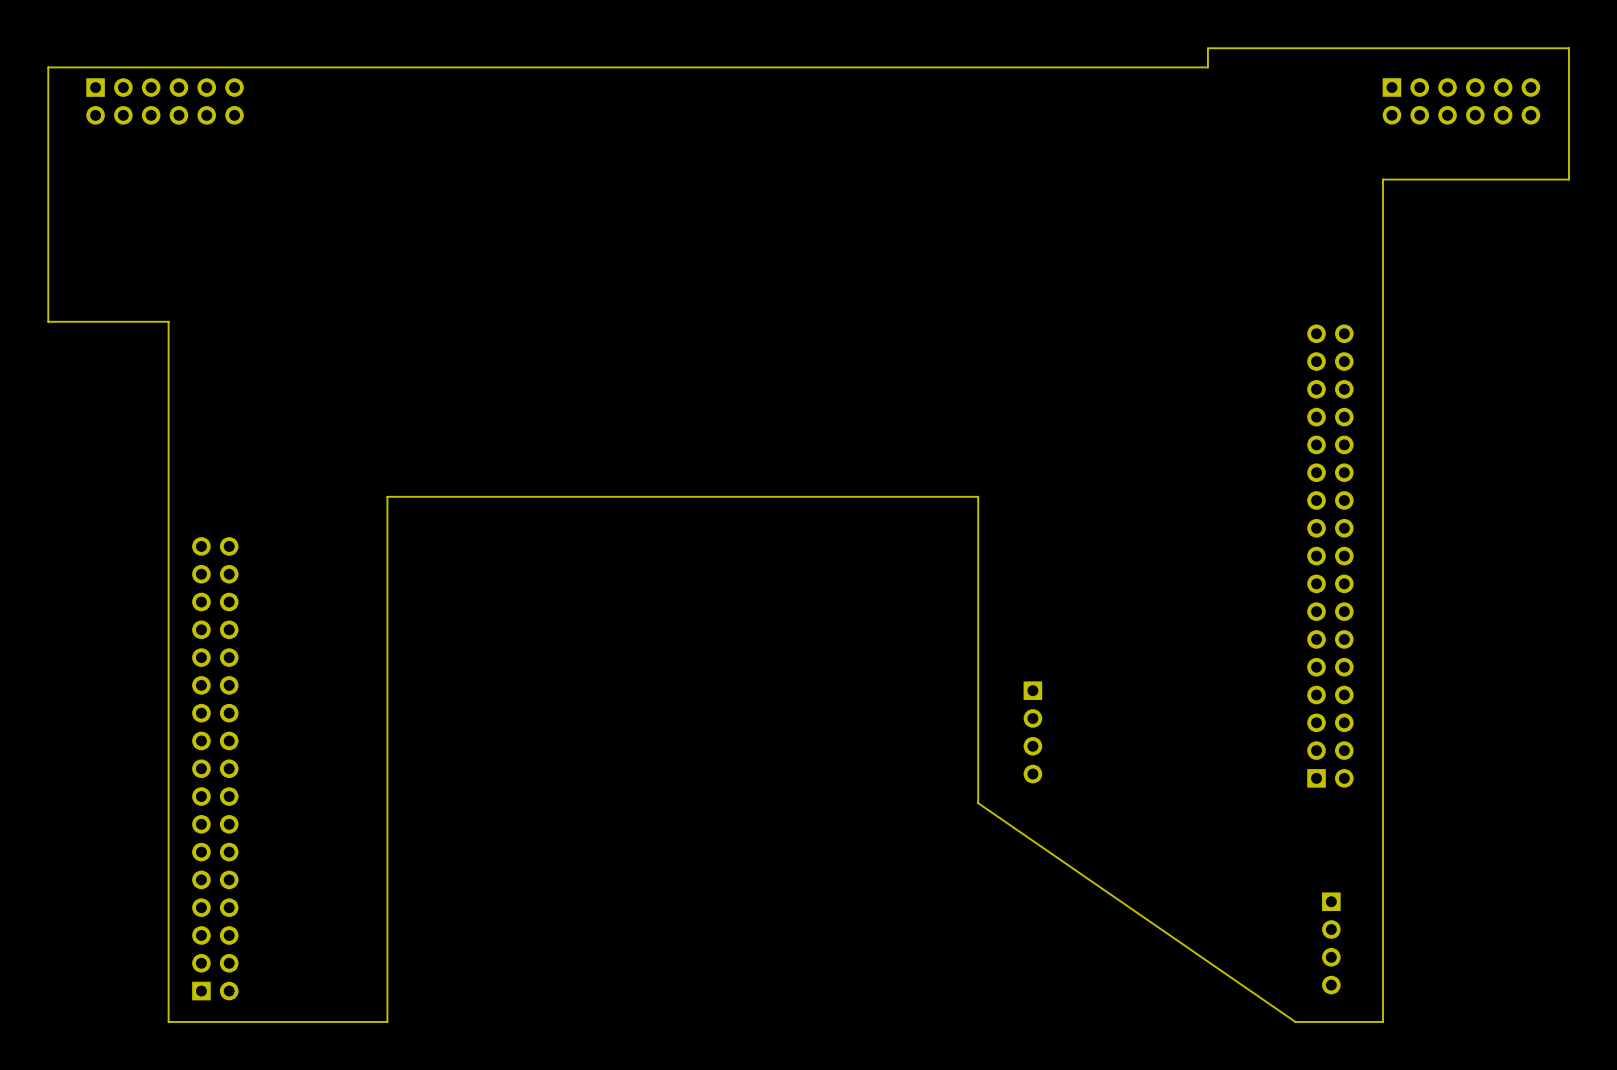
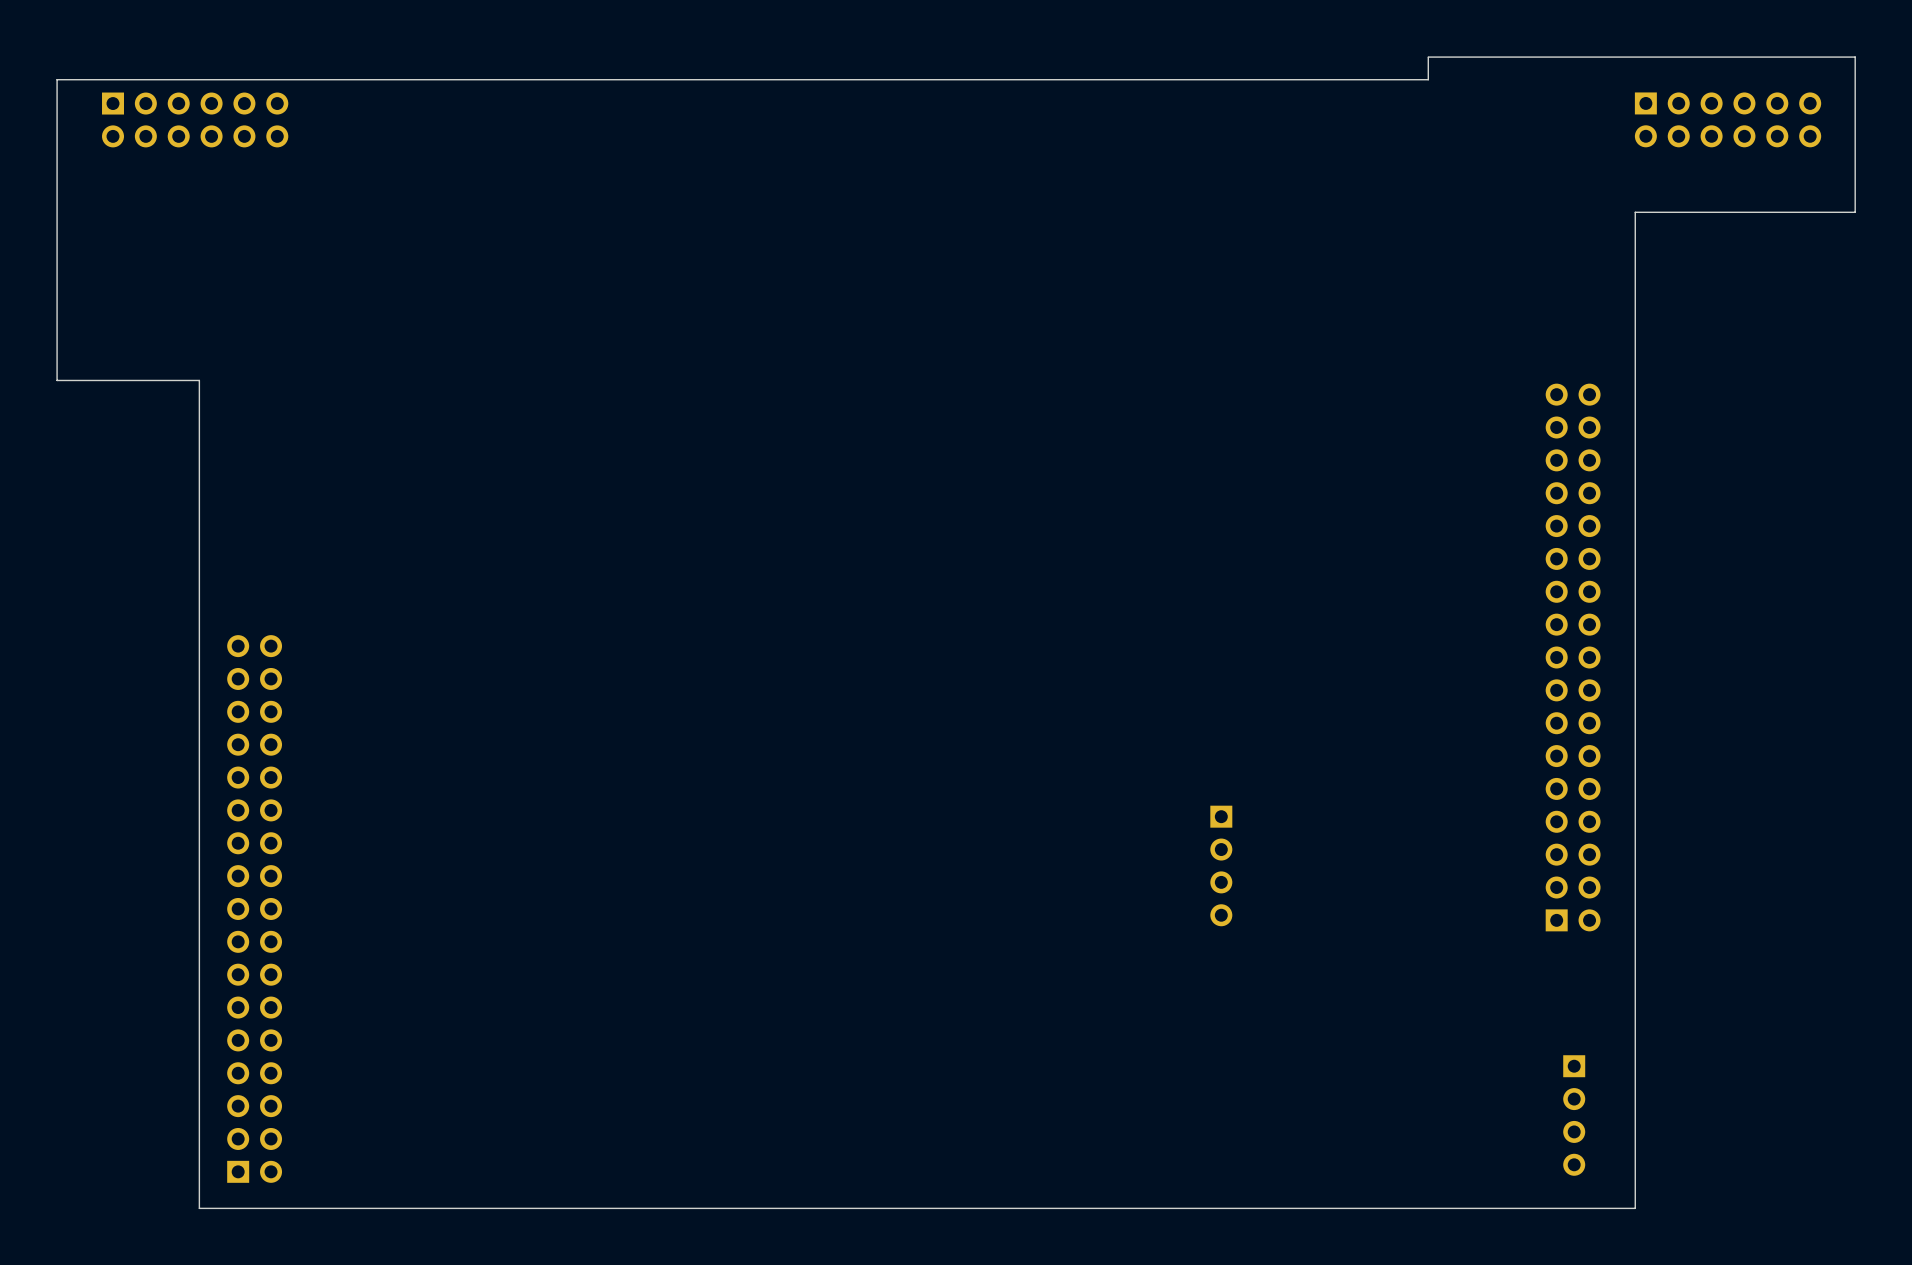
board edge: (1295, 1021) (978, 803) (978, 496) (387, 496) (387, 1021) -> (1531, 1208) (458, 1208)

